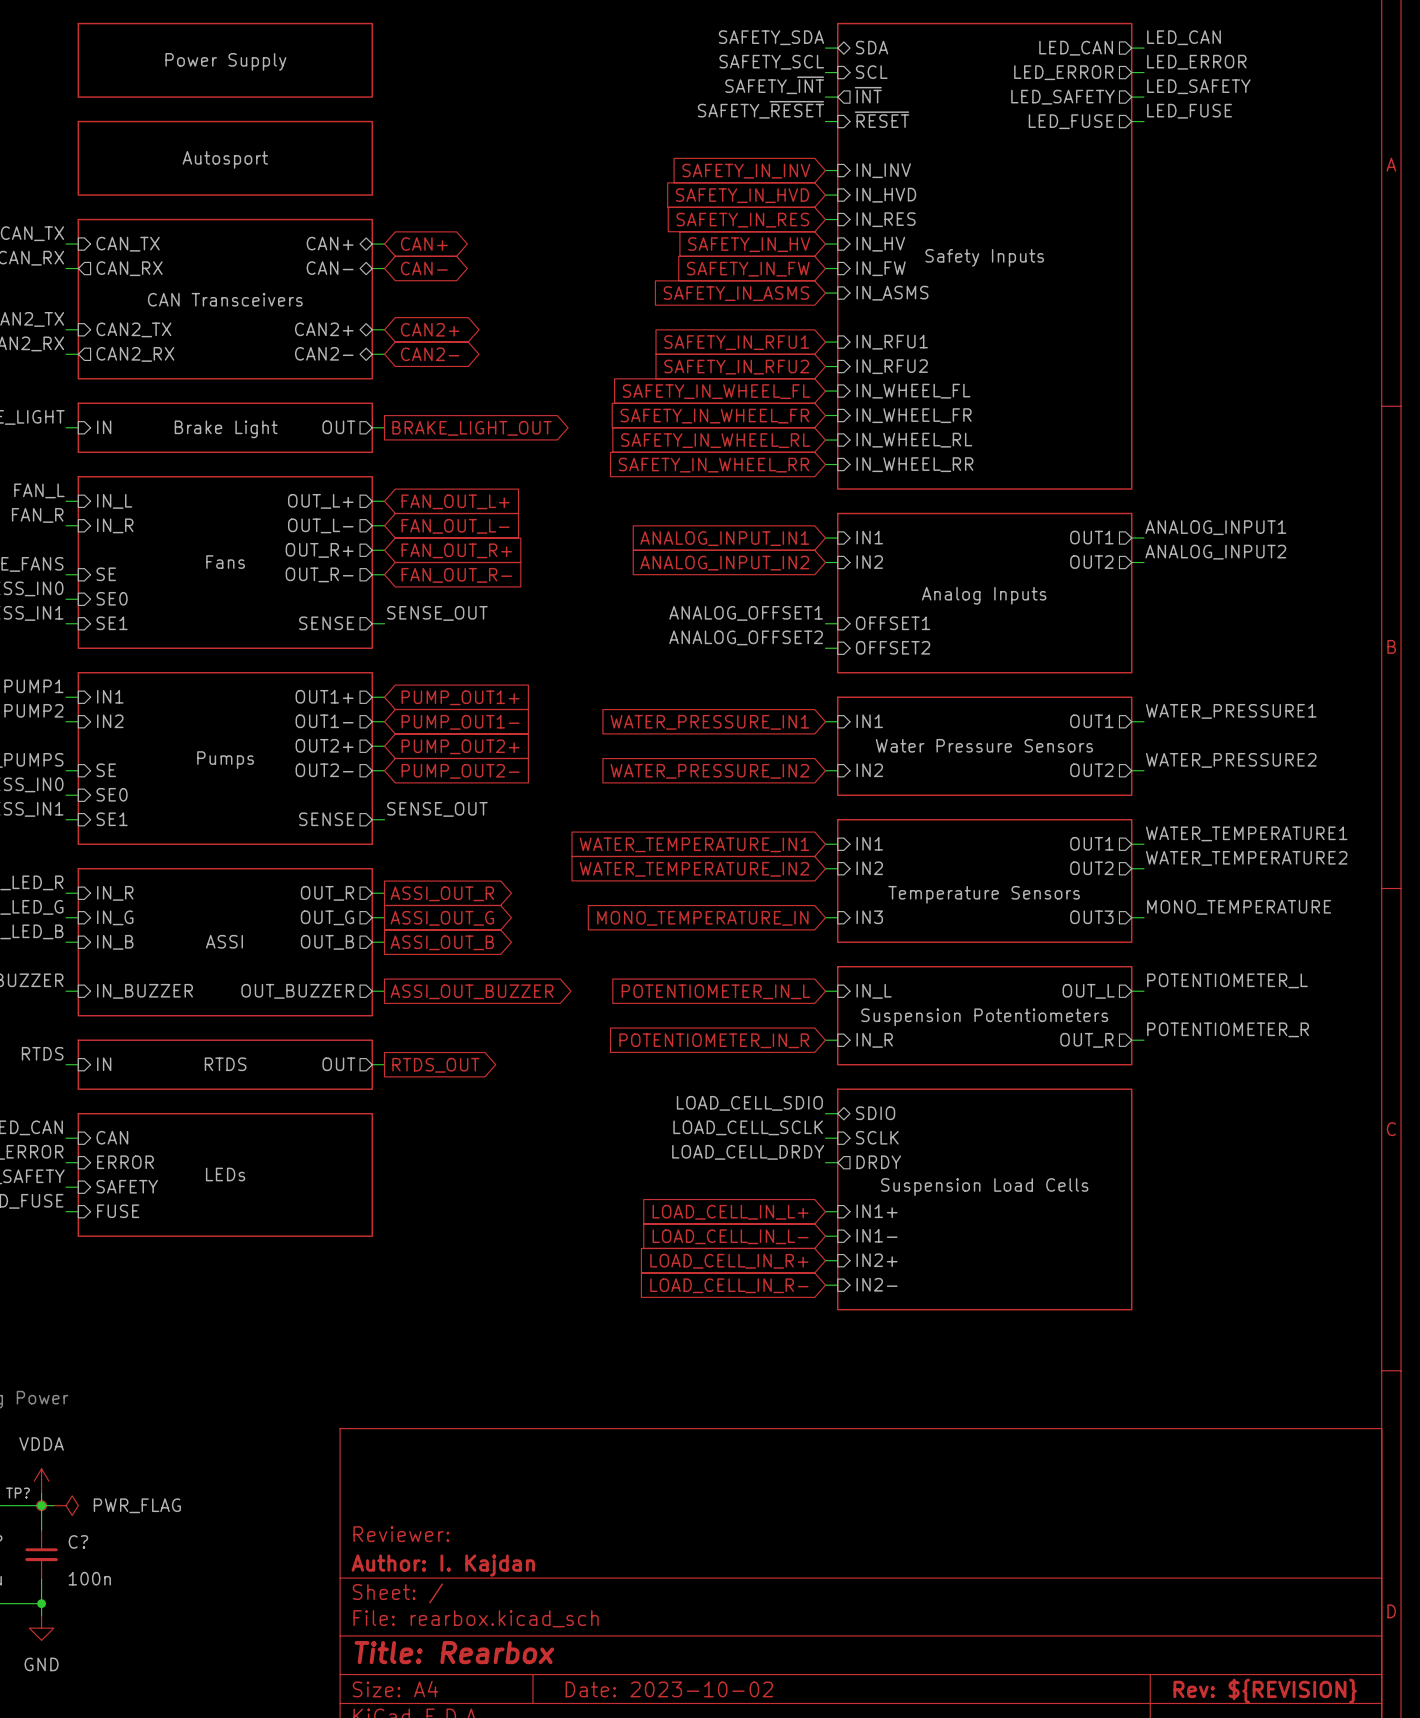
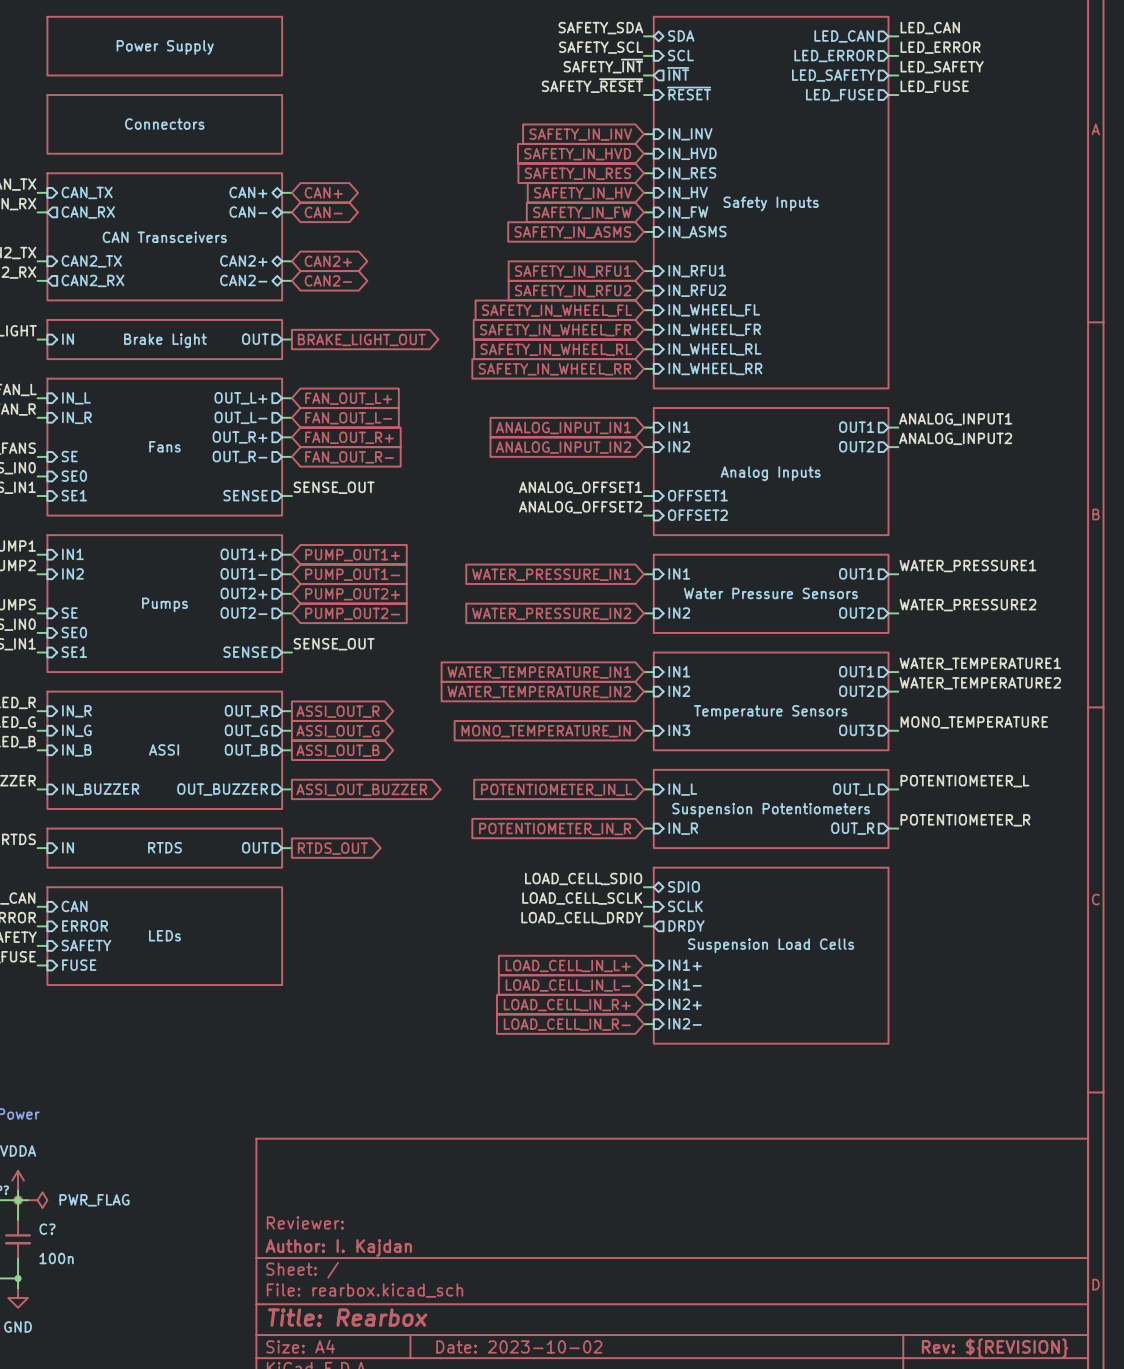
sheet Autosport name: Autosport (225, 159) -> Connectors (164, 124)

